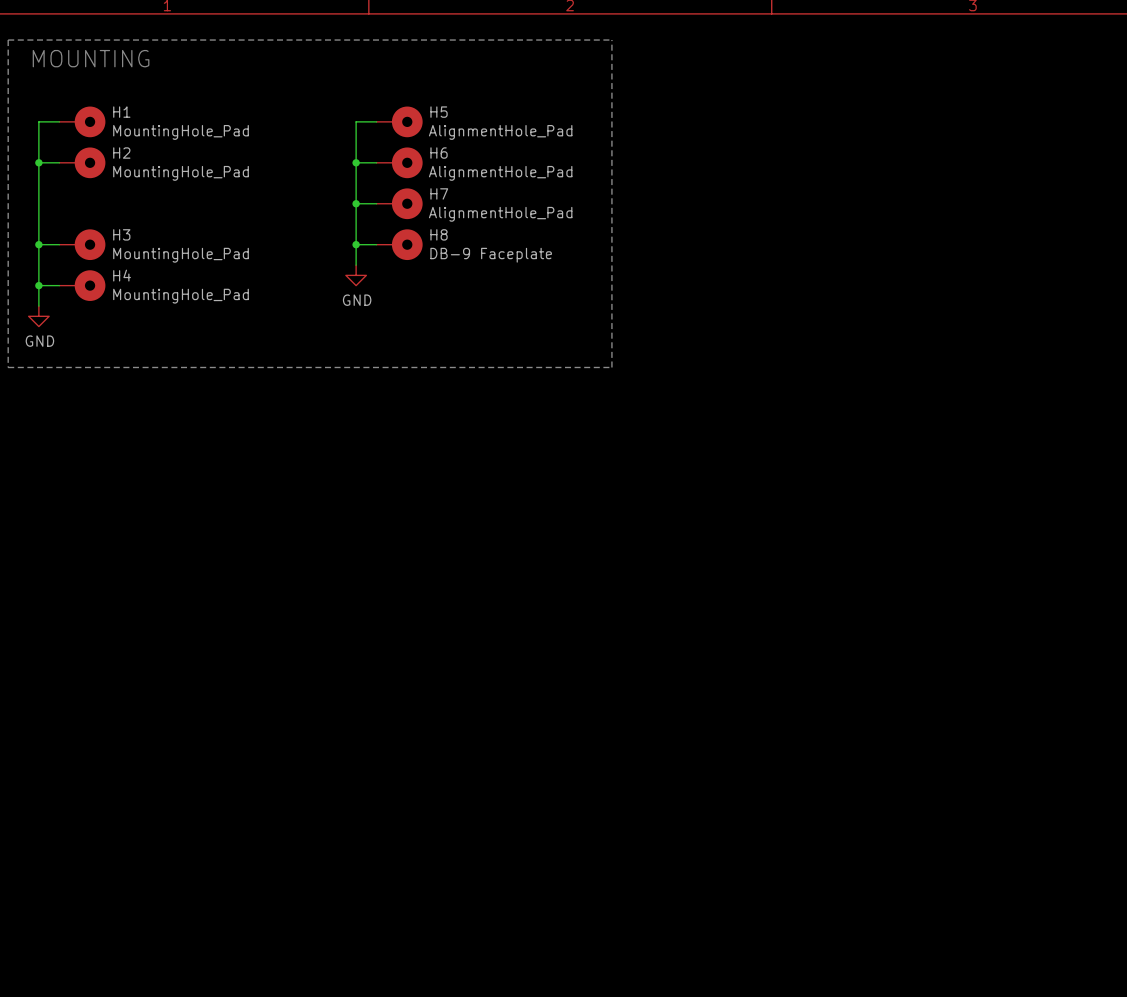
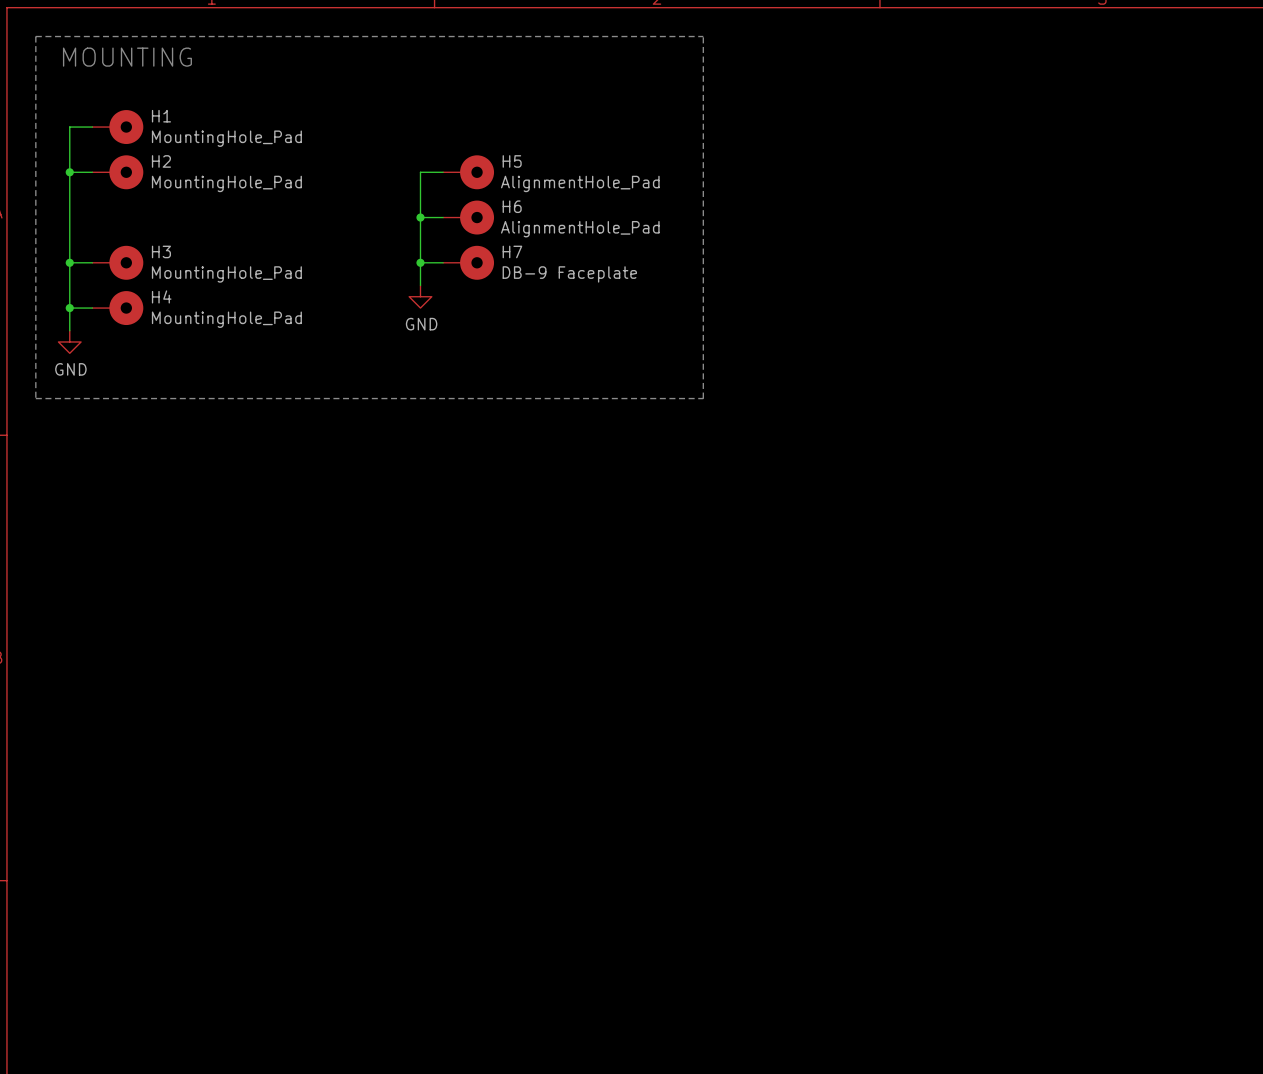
wire: (376, 121) (356, 121) (356, 162) -> none
H5: AlignmentHole_Pad (399, 121) -> none
H6 name: H6 (439, 153) -> H5 (512, 161)
junction: (356, 162) -> none
H7 name: H7 (439, 193) -> H6 (512, 206)
H8 name: H8 (439, 234) -> H7 (512, 251)

